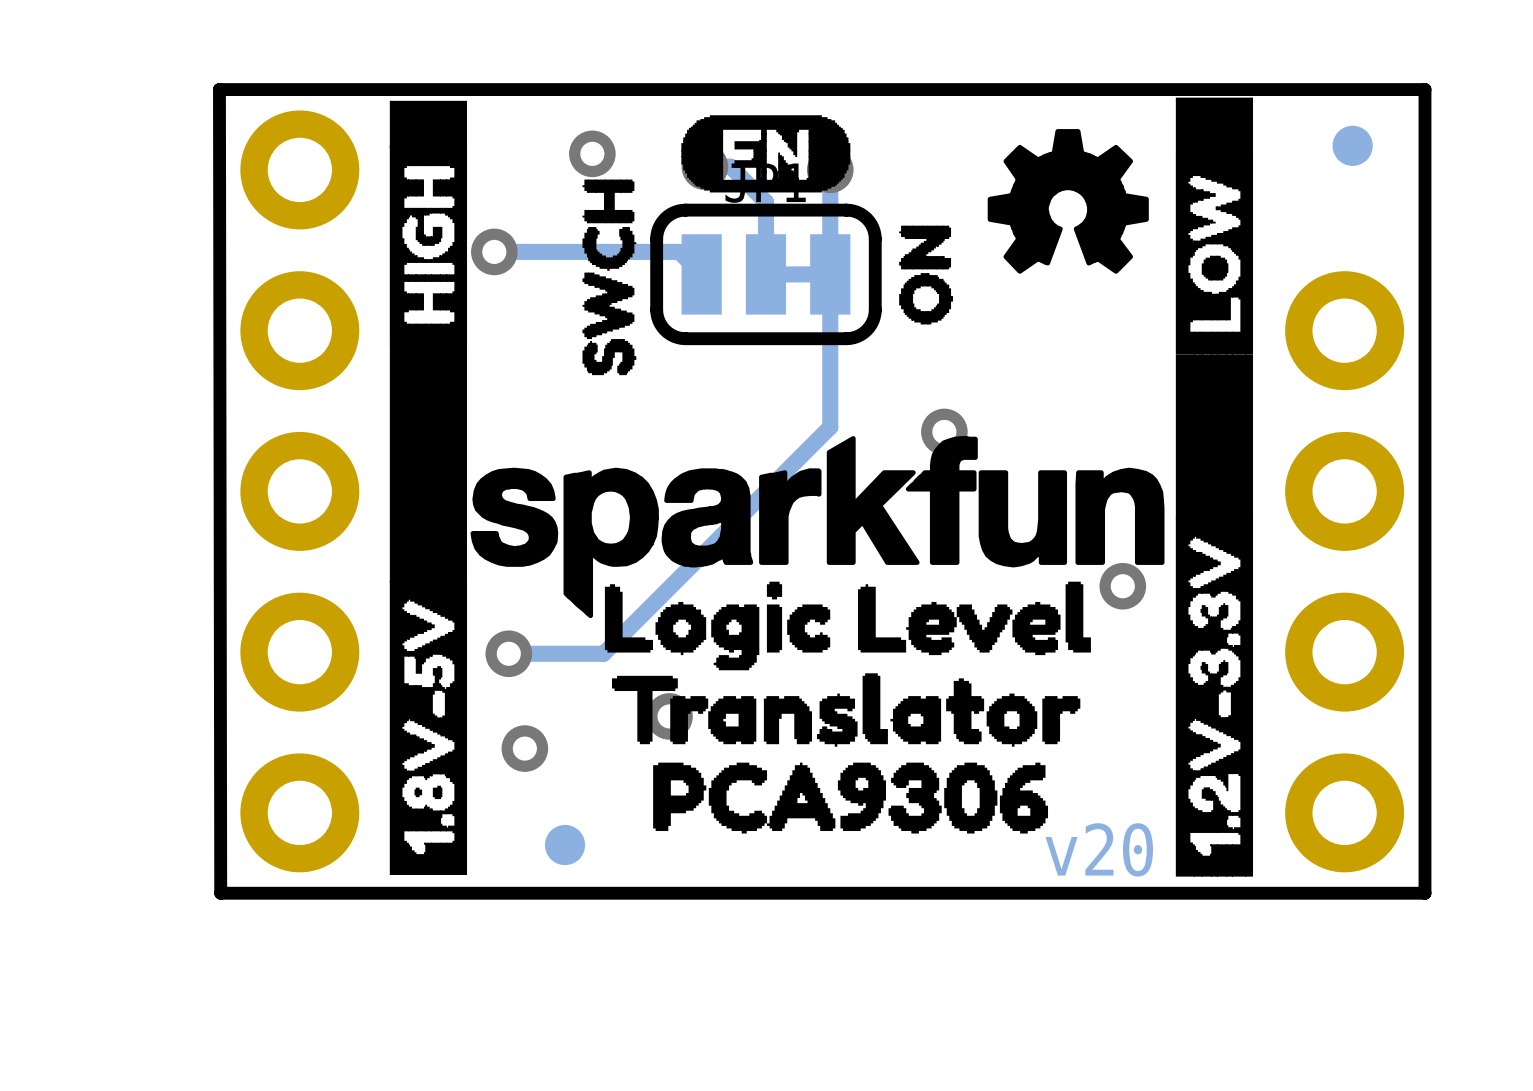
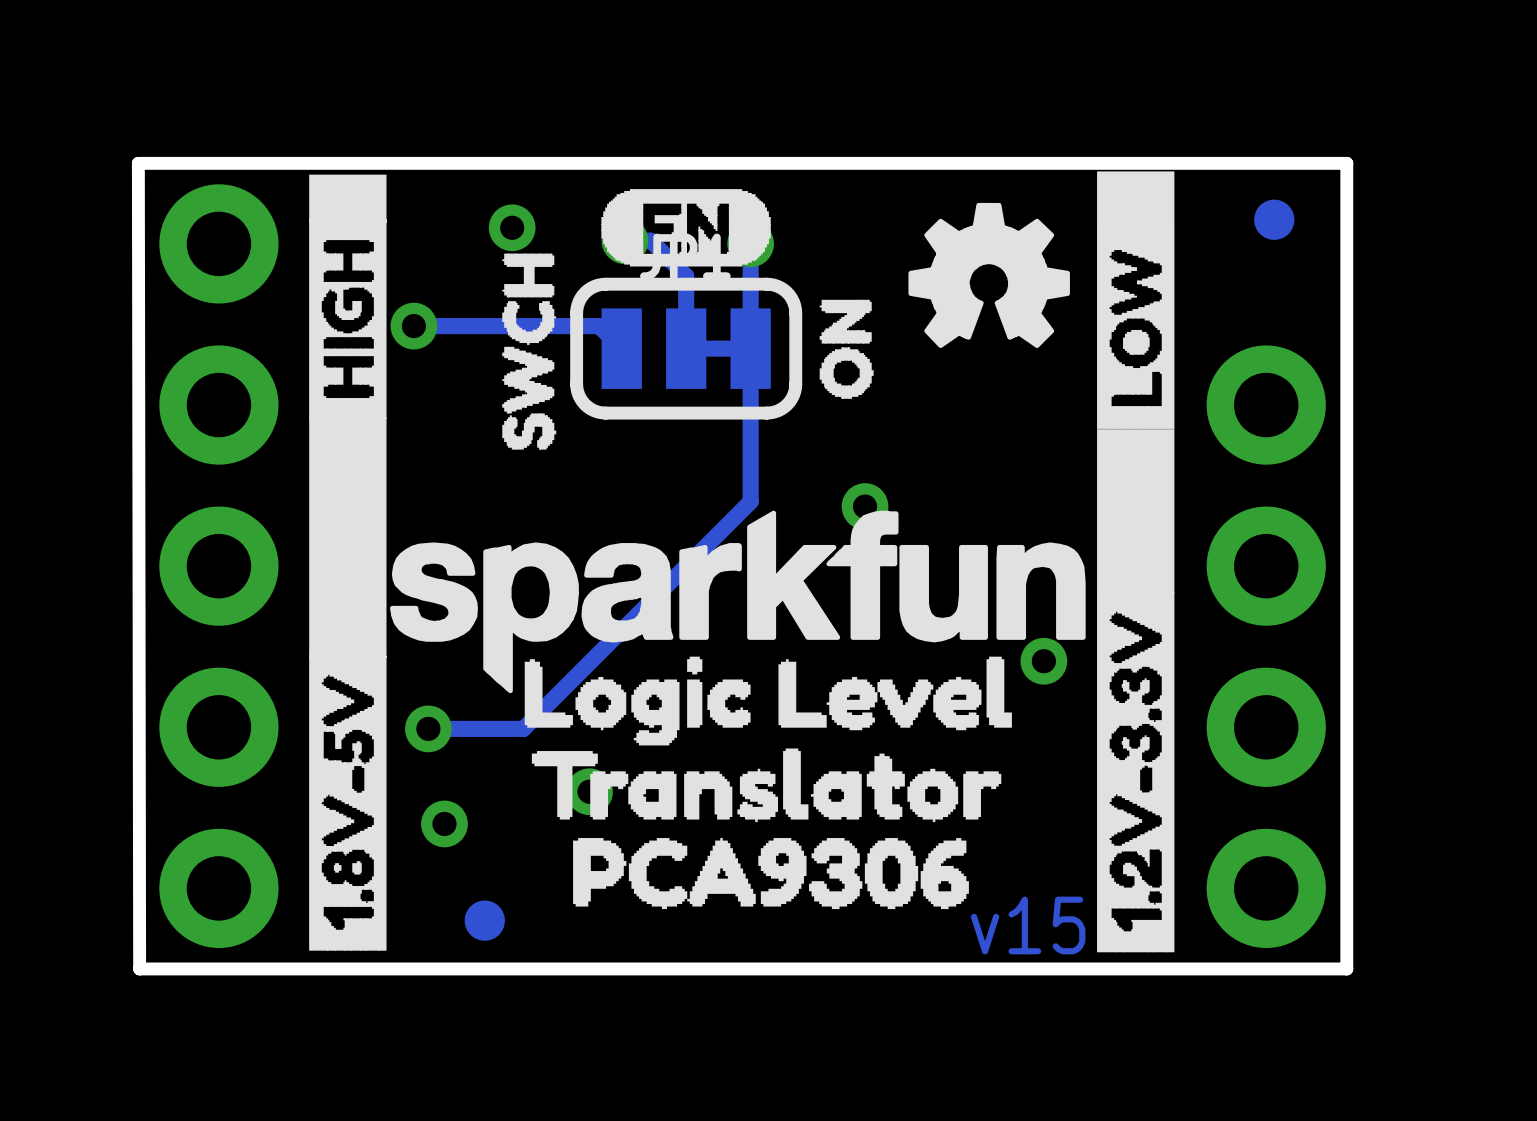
text: v20 (1099, 849) -> v15 (1028, 925)

